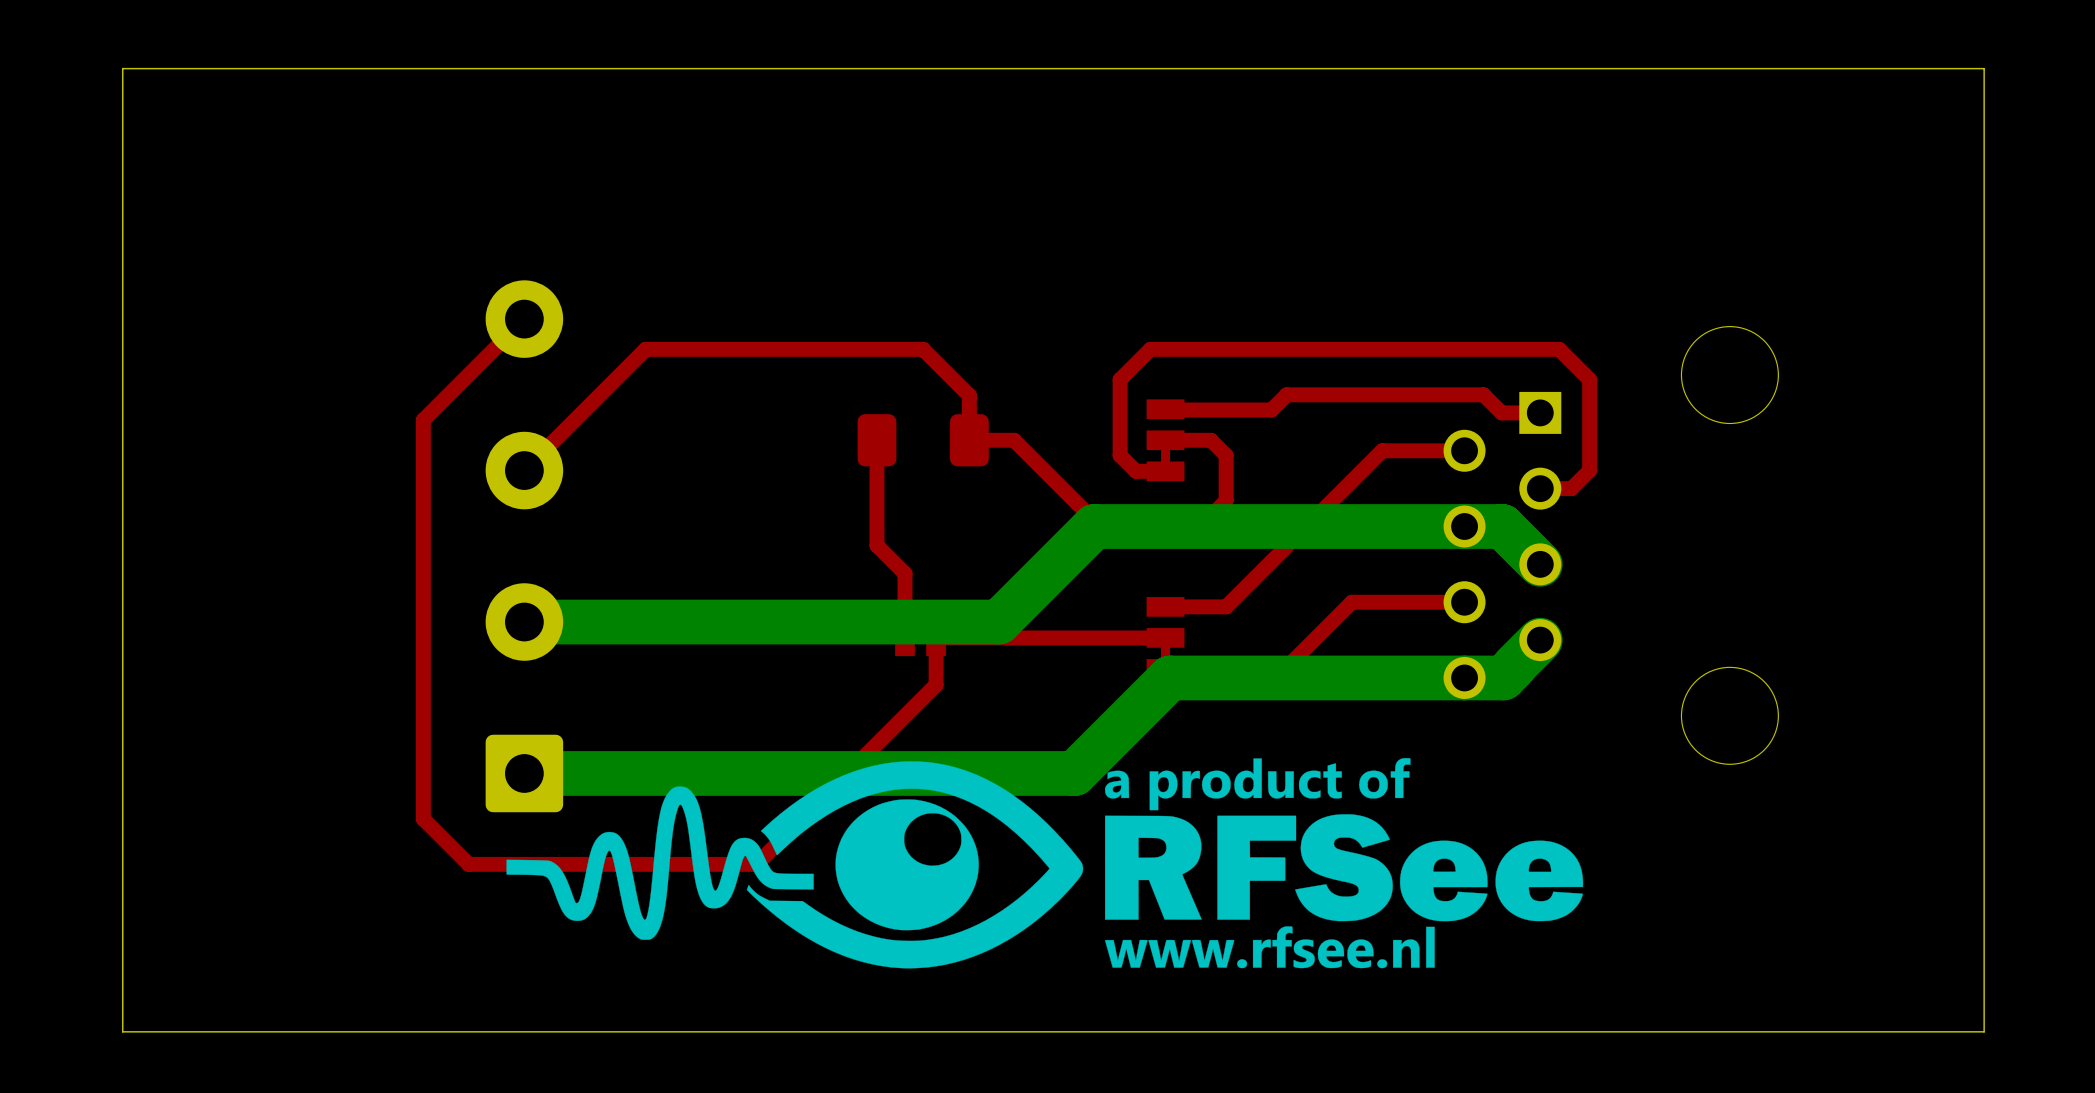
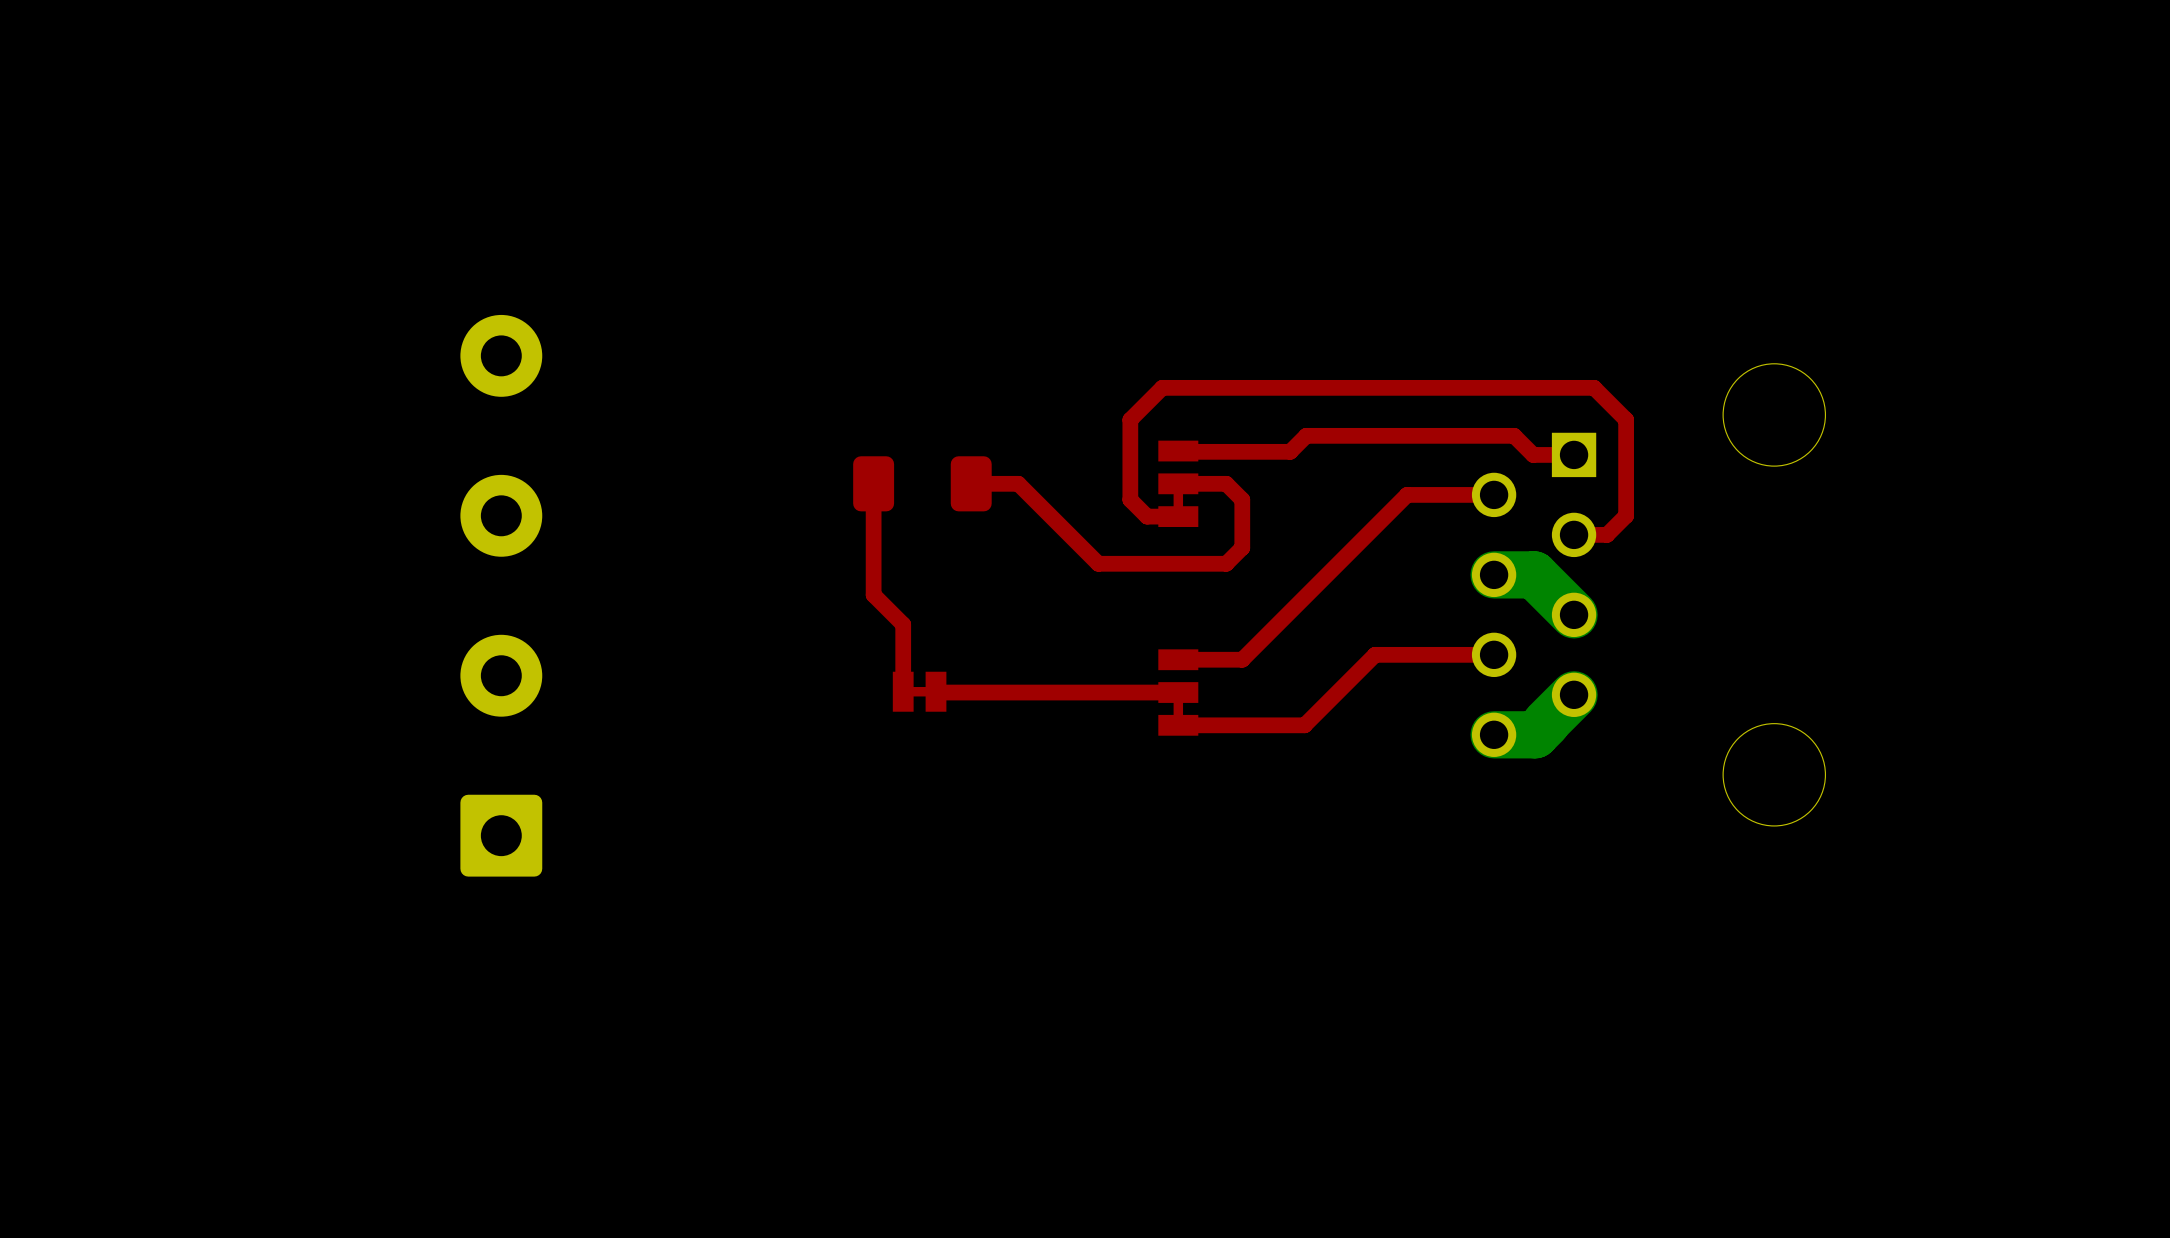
board edge: (1984, 68) (122, 68) (122, 1031) (1984, 1031) (1984, 68) -> none
top track: (524, 319) (423, 420) (423, 818) (468, 864) (756, 864) (936, 684) (936, 637) -> none
top track: (969, 440) (969, 395) (923, 349) (645, 349) (524, 470) -> none
bottom track: (1464, 526) (1094, 526) (998, 622) (524, 622) -> none
bottom track: (1464, 677) (1170, 677) (1074, 773) (524, 773) -> none
drawing: [506, 758, 1584, 969] -> none

